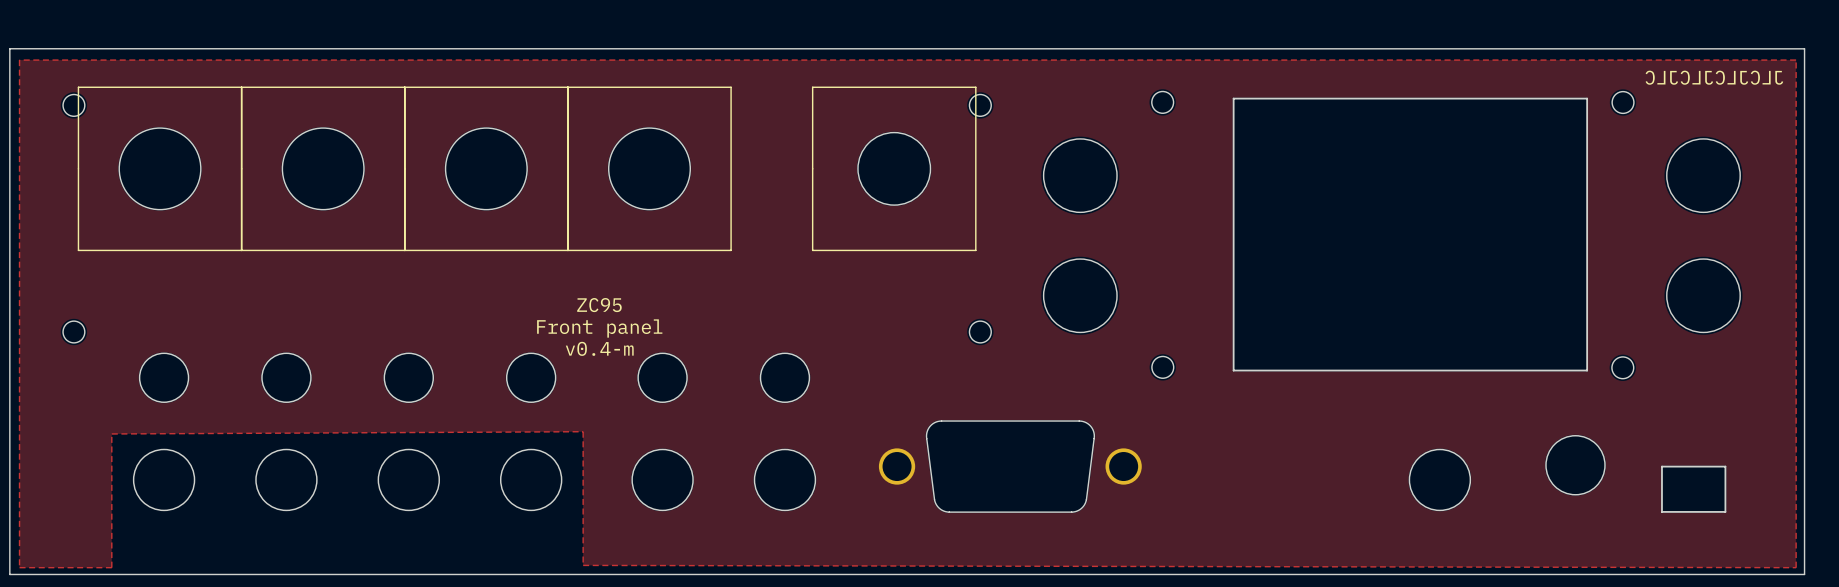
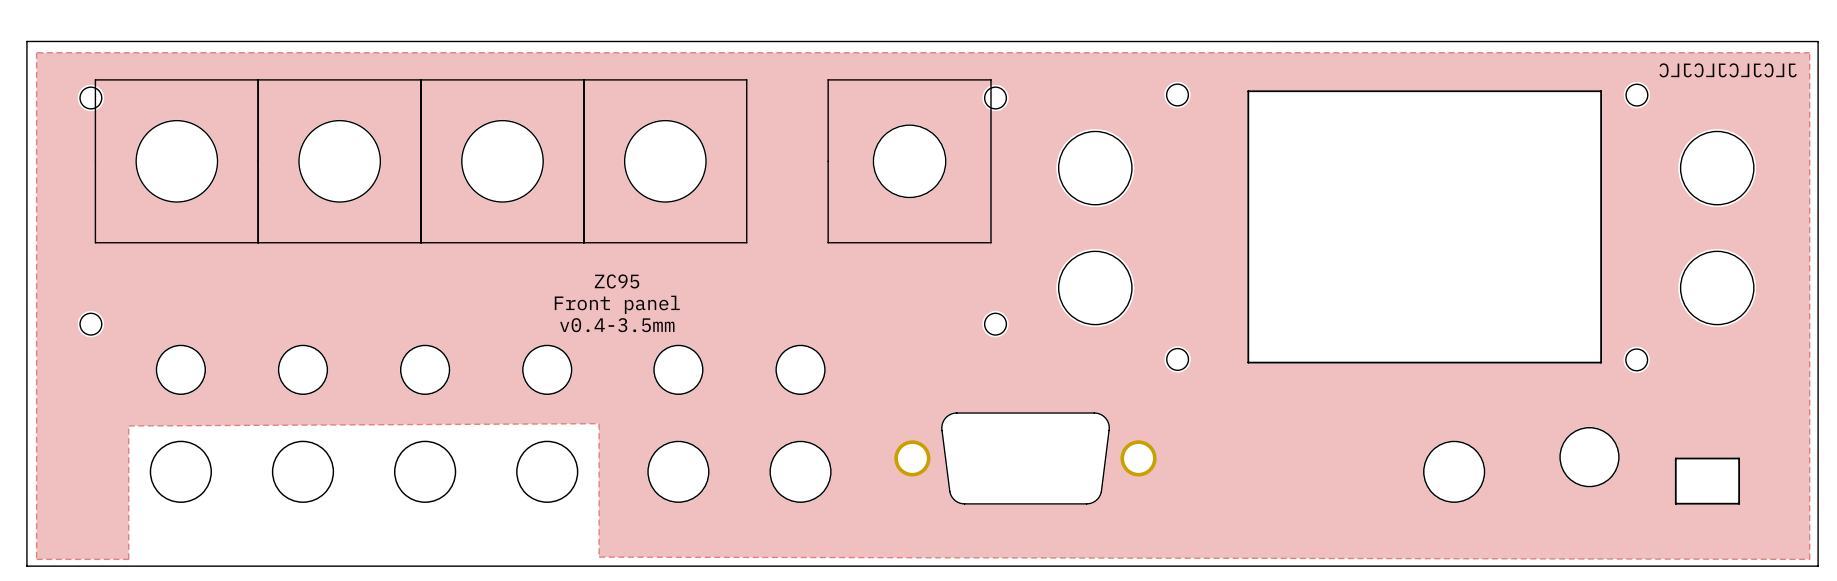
text: none -> ZC95 (617, 281)
text: ZC95 (599, 305) -> Front panel (617, 304)
text: Front panel (599, 328) -> v0.4-3.5mm (617, 325)
text: v0.4-m (599, 348) -> none

